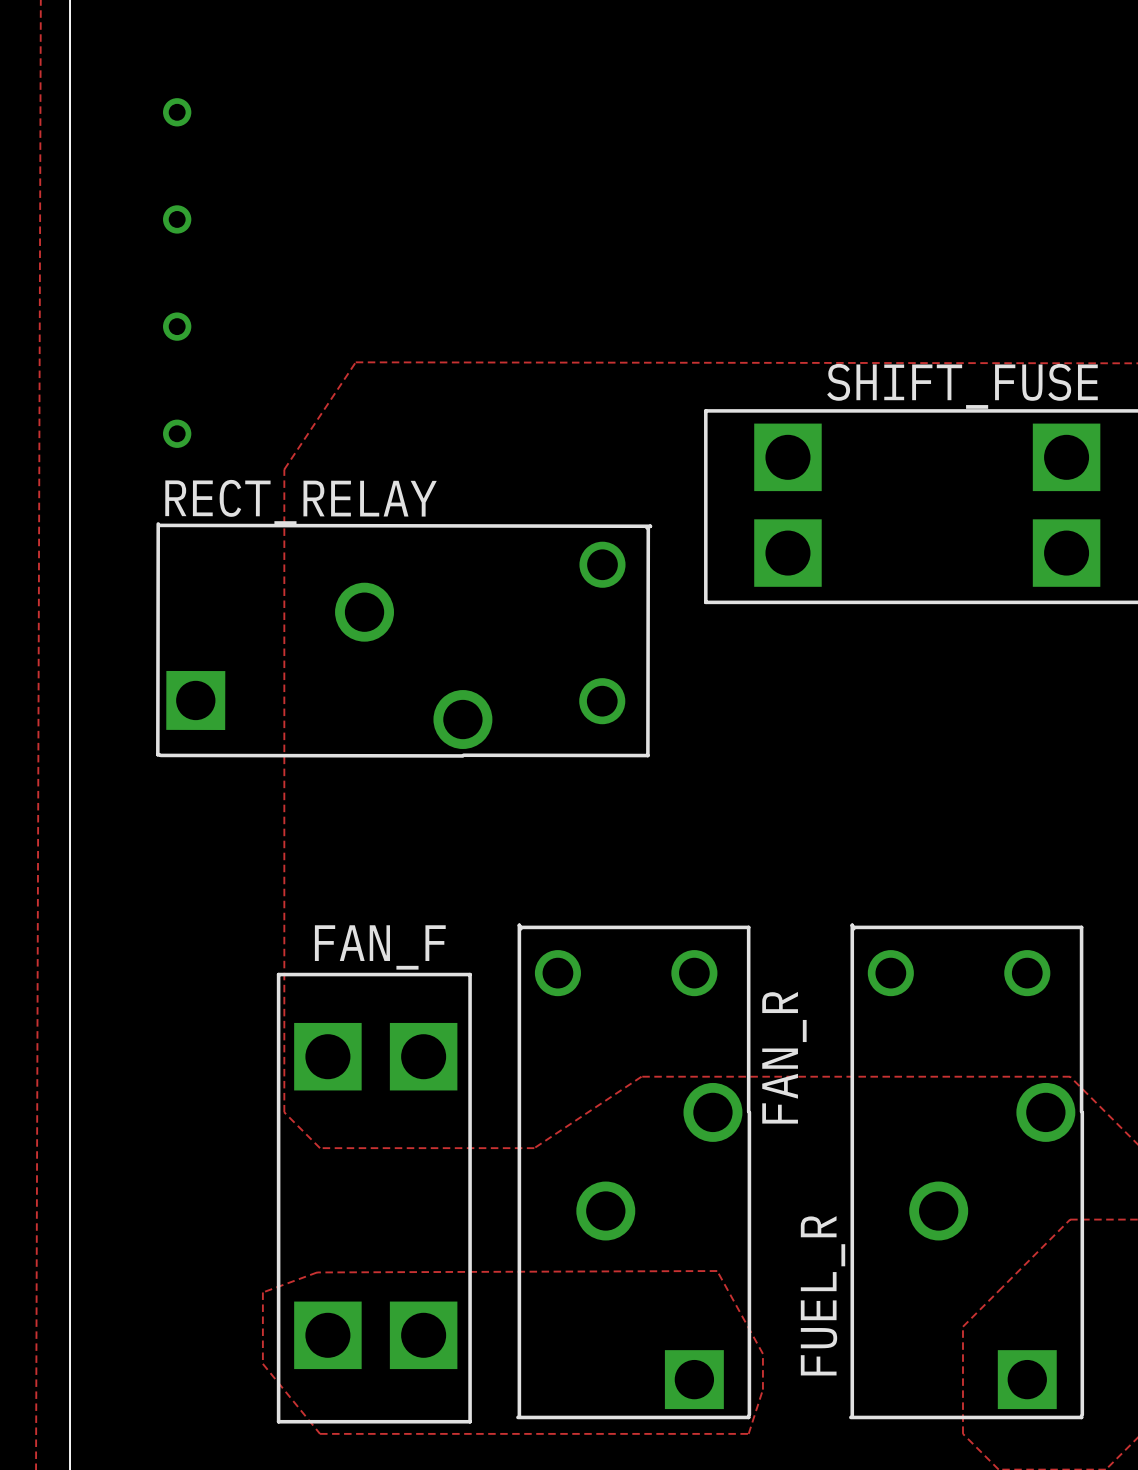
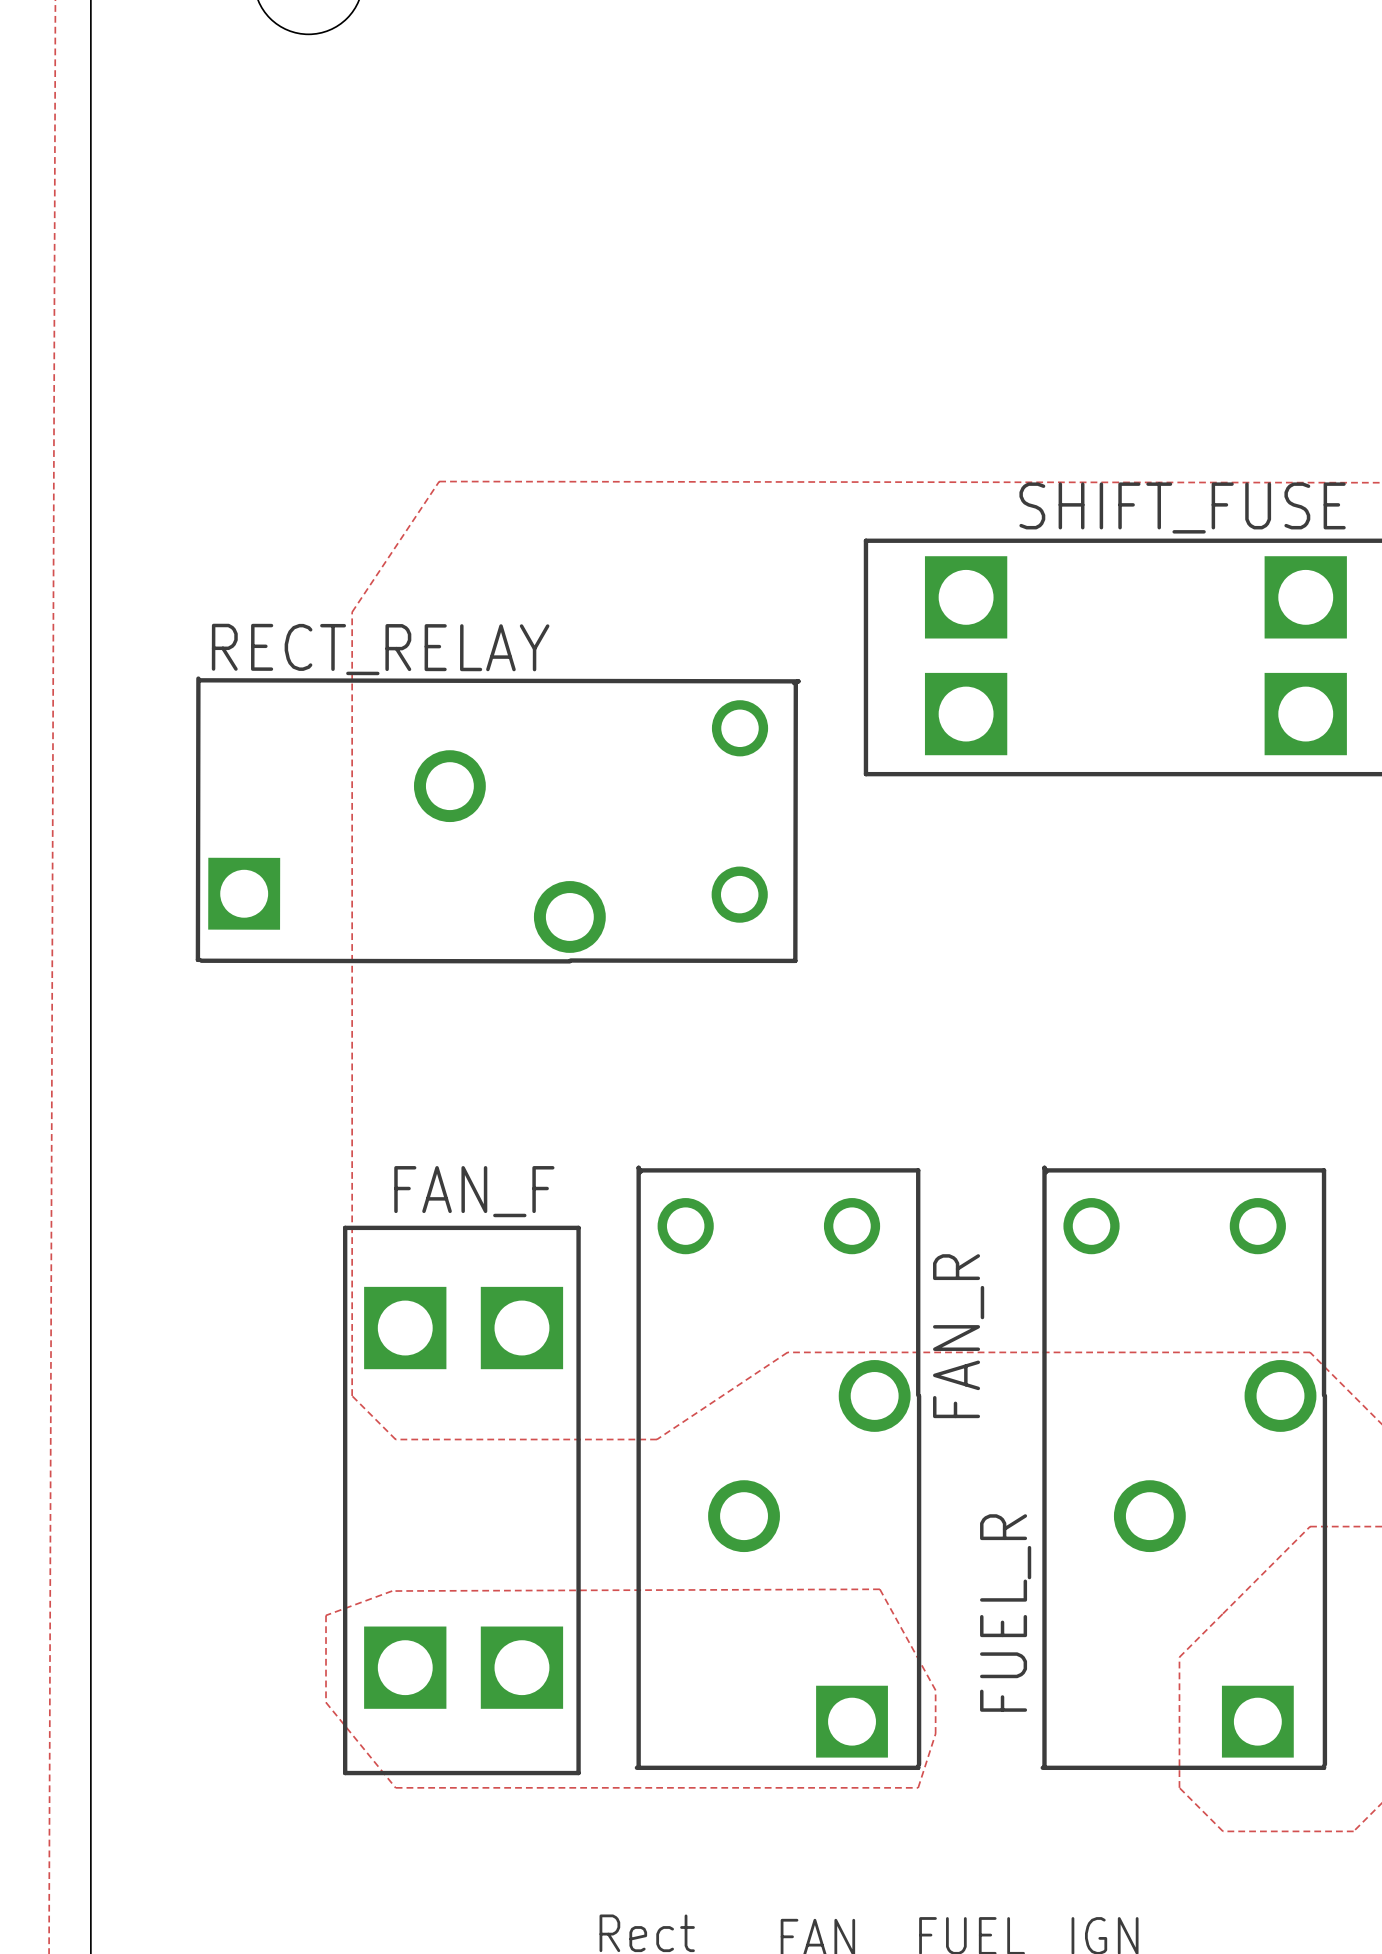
via: (177, 112) -> none
via: (177, 219) -> none
via: (177, 326) -> none
via: (177, 433) -> none

